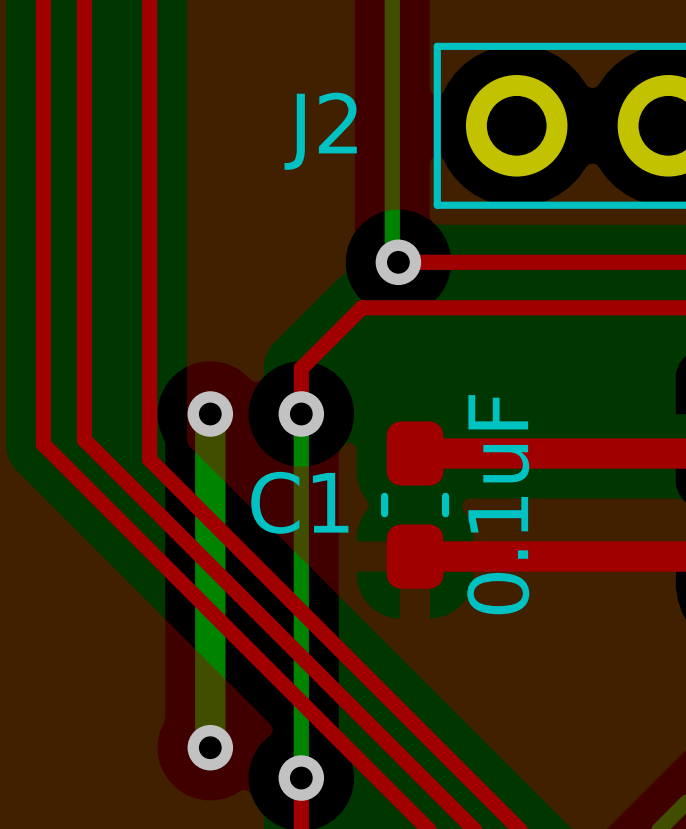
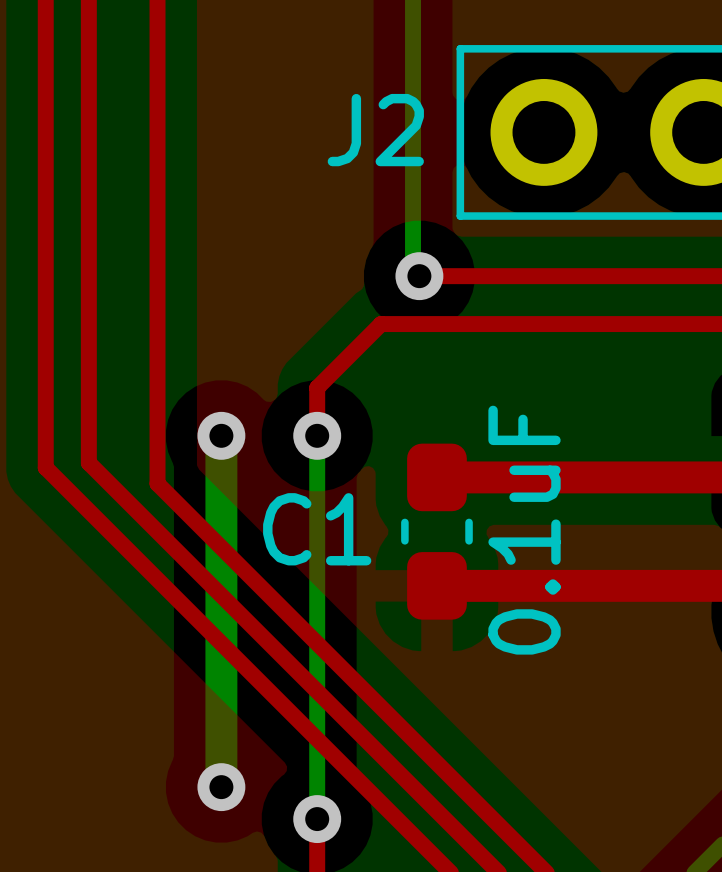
J2 name position: J2 (320, 131) -> J2 (375, 130)

